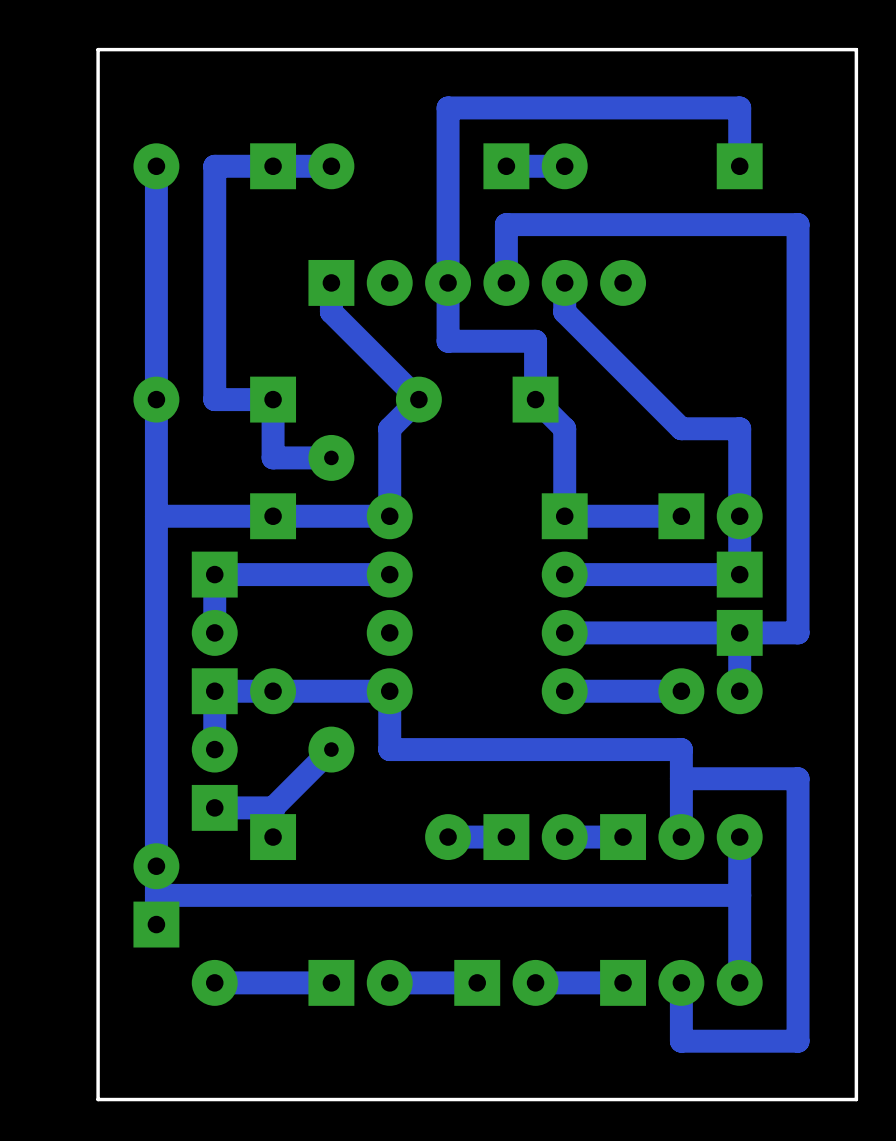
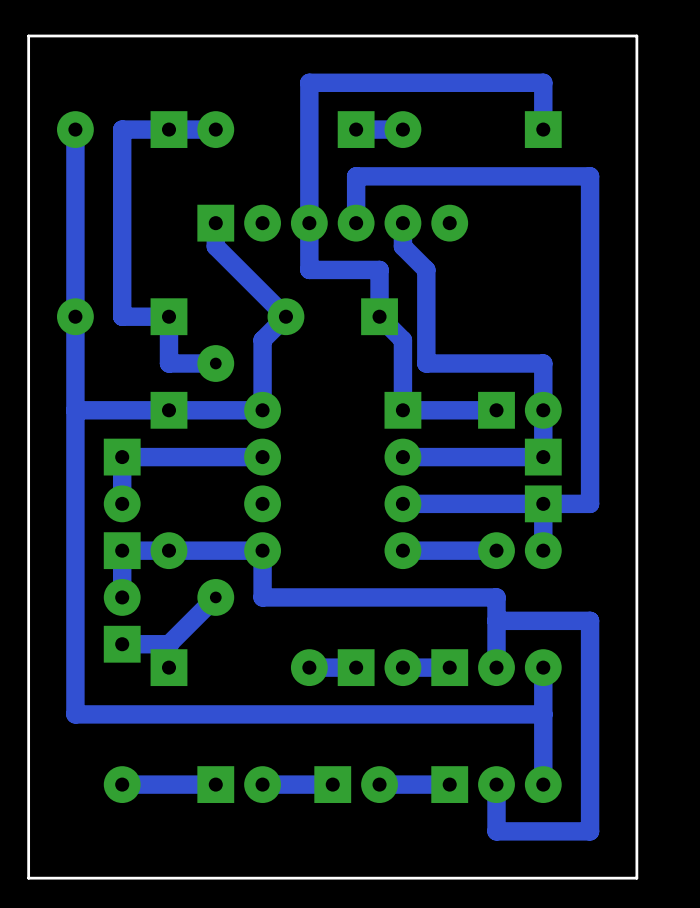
track: (593, 341) (681, 428) (739, 428) (739, 457) -> (426, 269) (426, 363) (543, 363)
part: (156, 895) -> none

